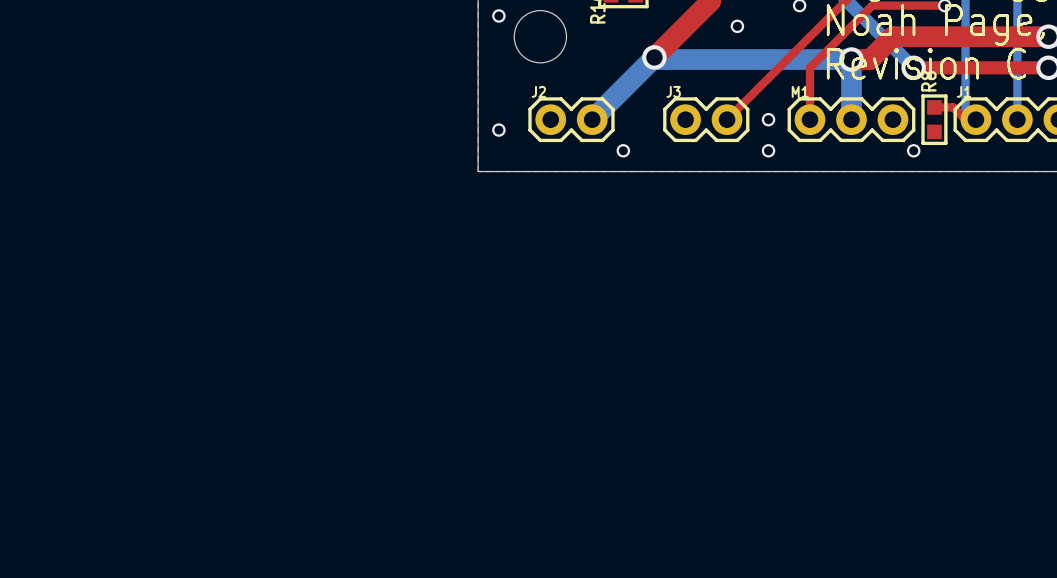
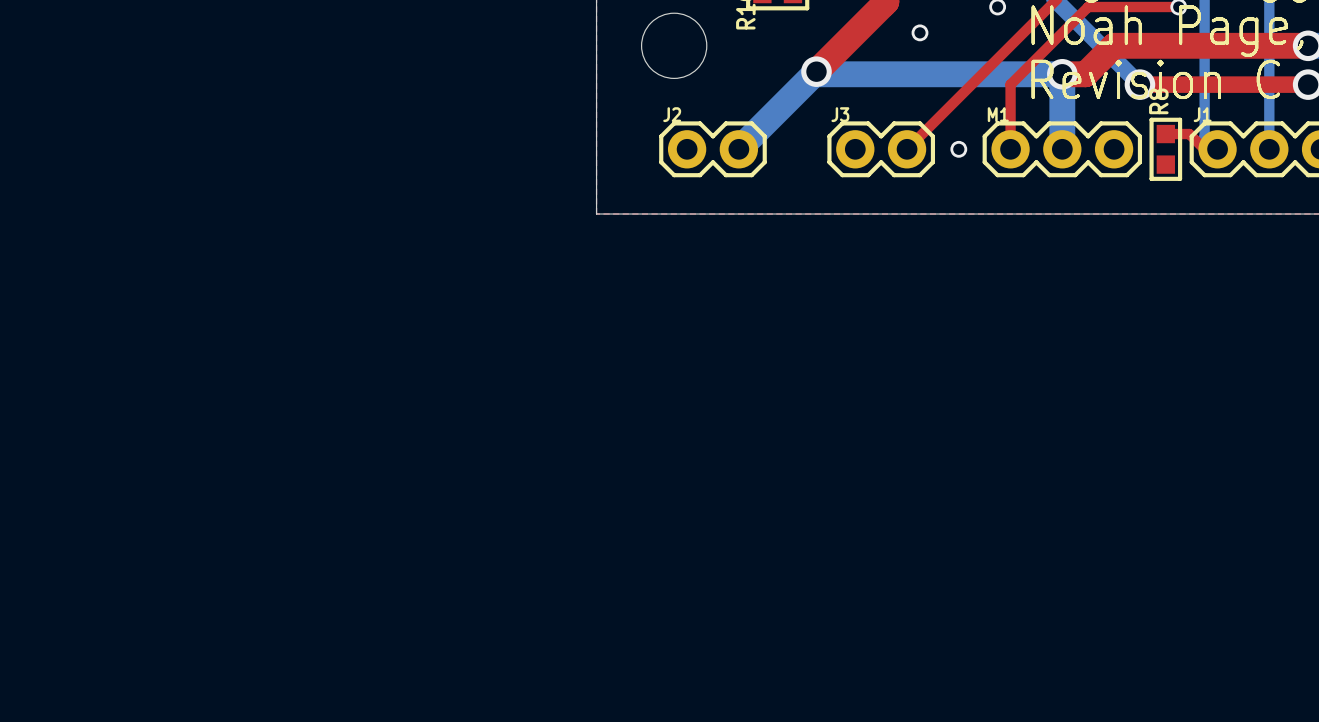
via: (498, 15) -> none
via: (498, 130) -> none
via: (623, 150) -> none
via: (768, 150) -> none
via: (913, 150) -> none

